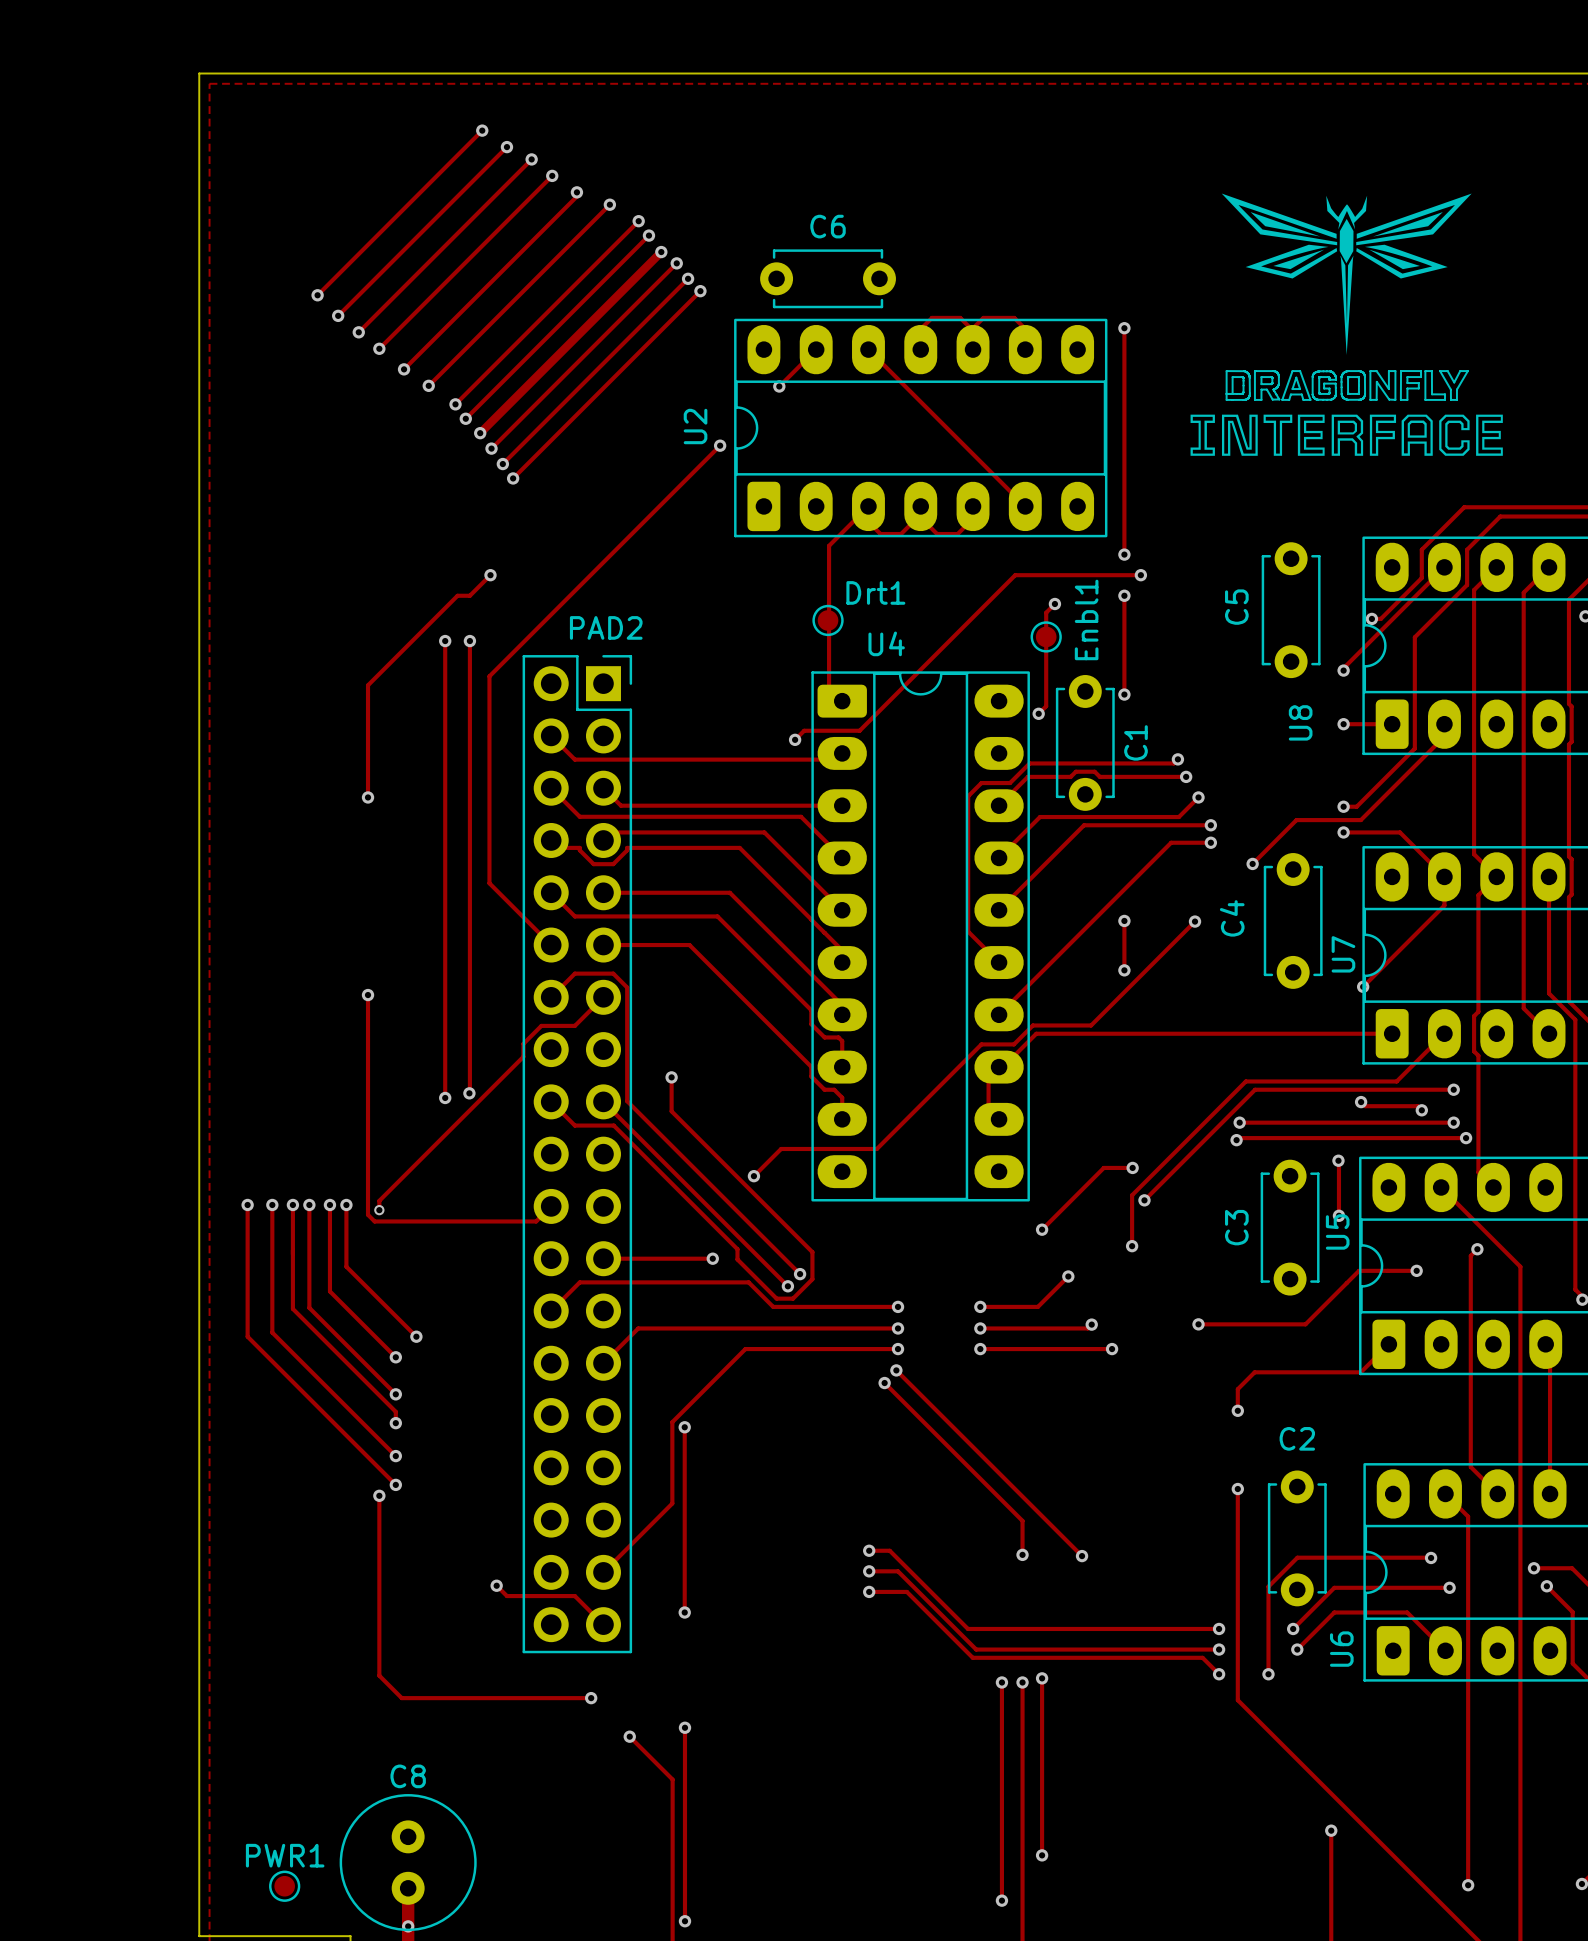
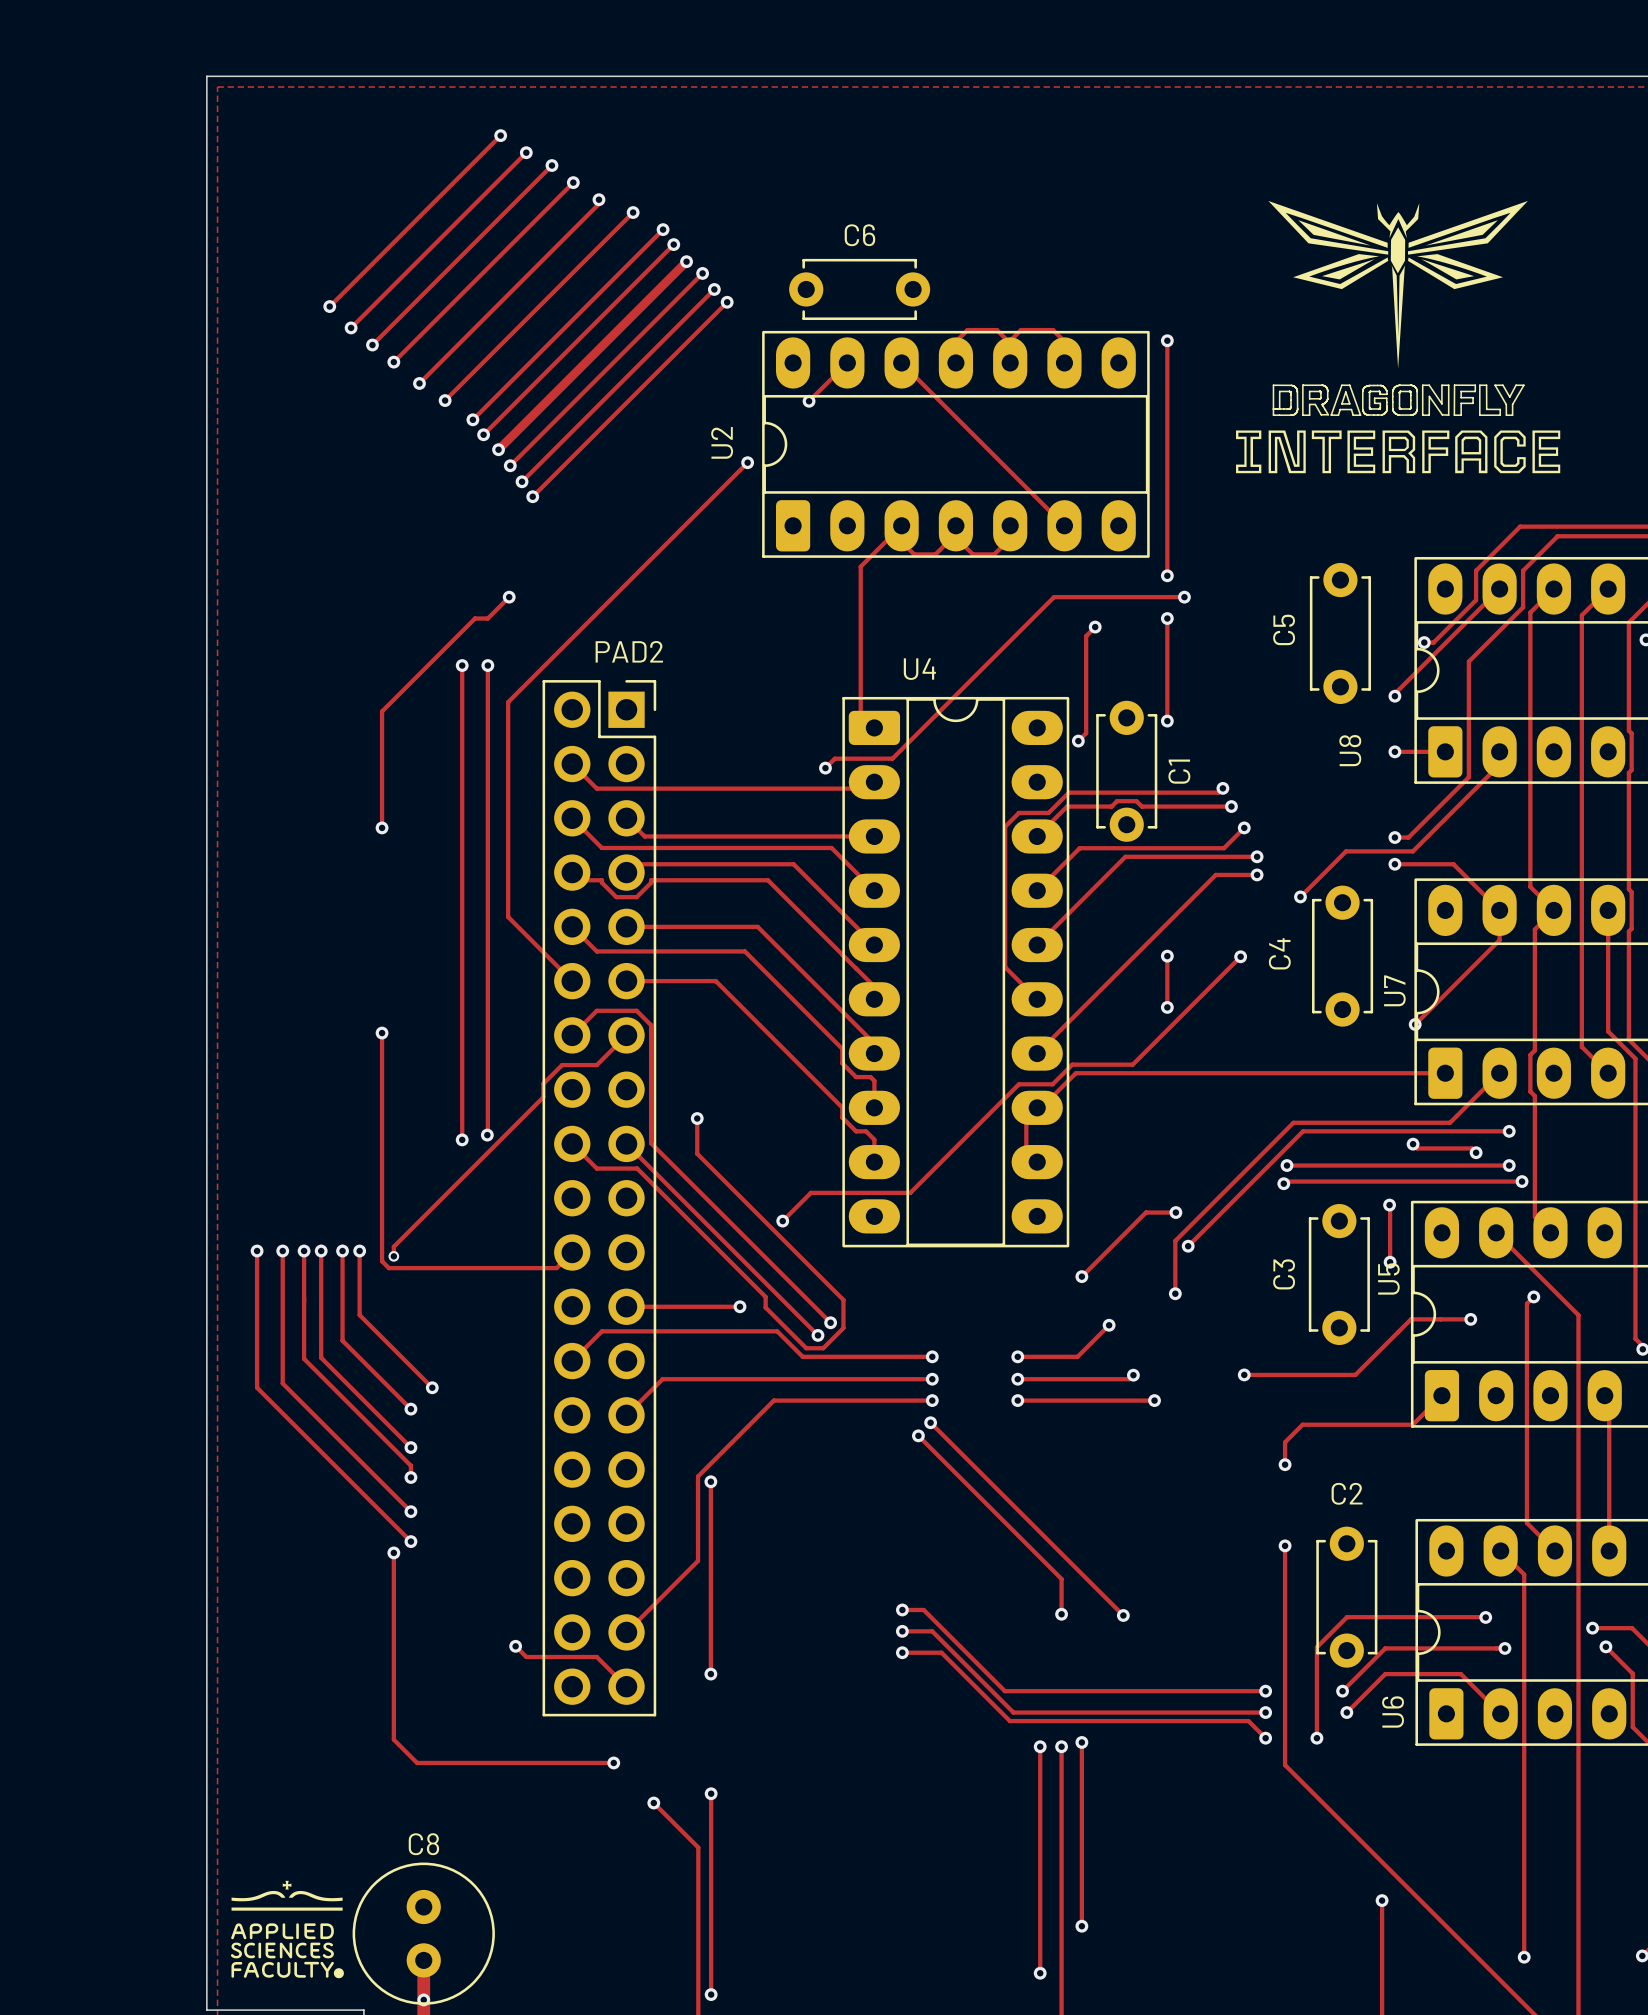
Drt1: (828, 620) -> none
Enbl1: (1046, 636) -> none
drawing: none -> [230, 1880, 344, 1979]
PWR1: (284, 1886) -> none

